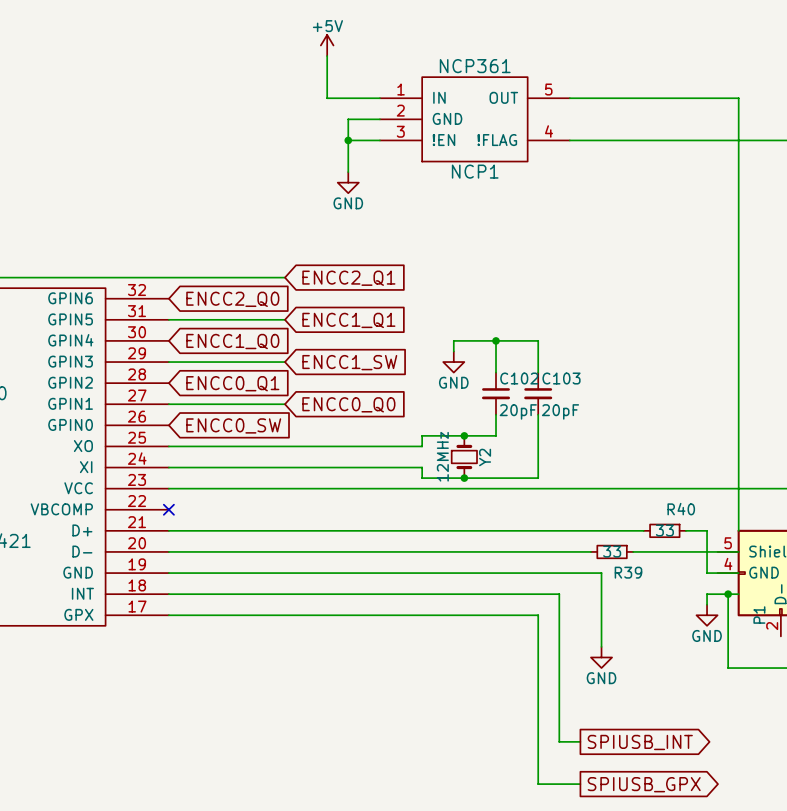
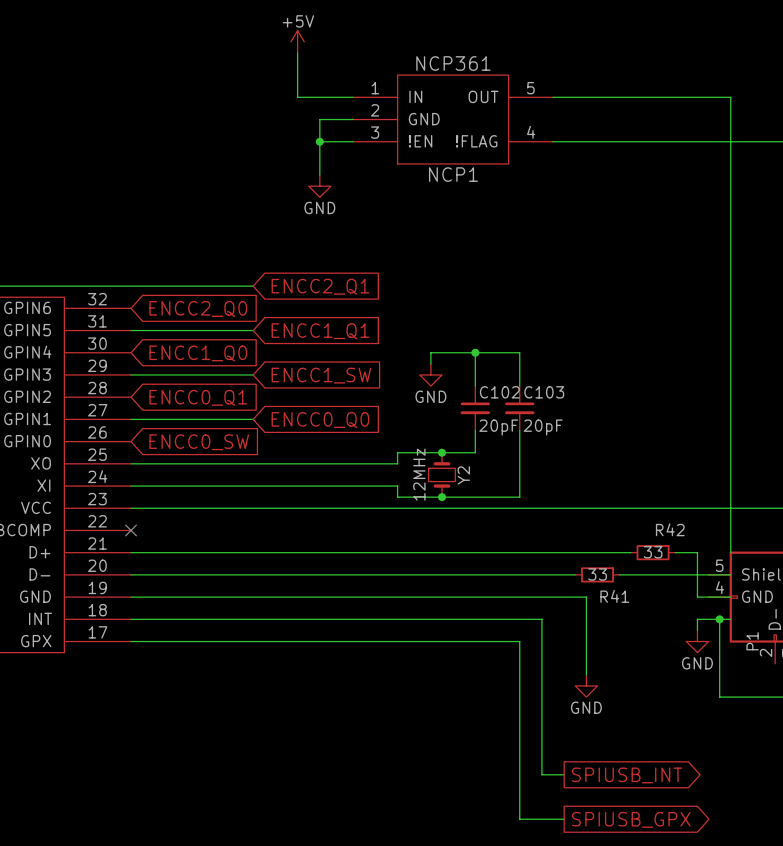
R40 name: R40 (681, 509) -> R42 (670, 529)
R39 name: R39 (628, 572) -> R41 (614, 596)

